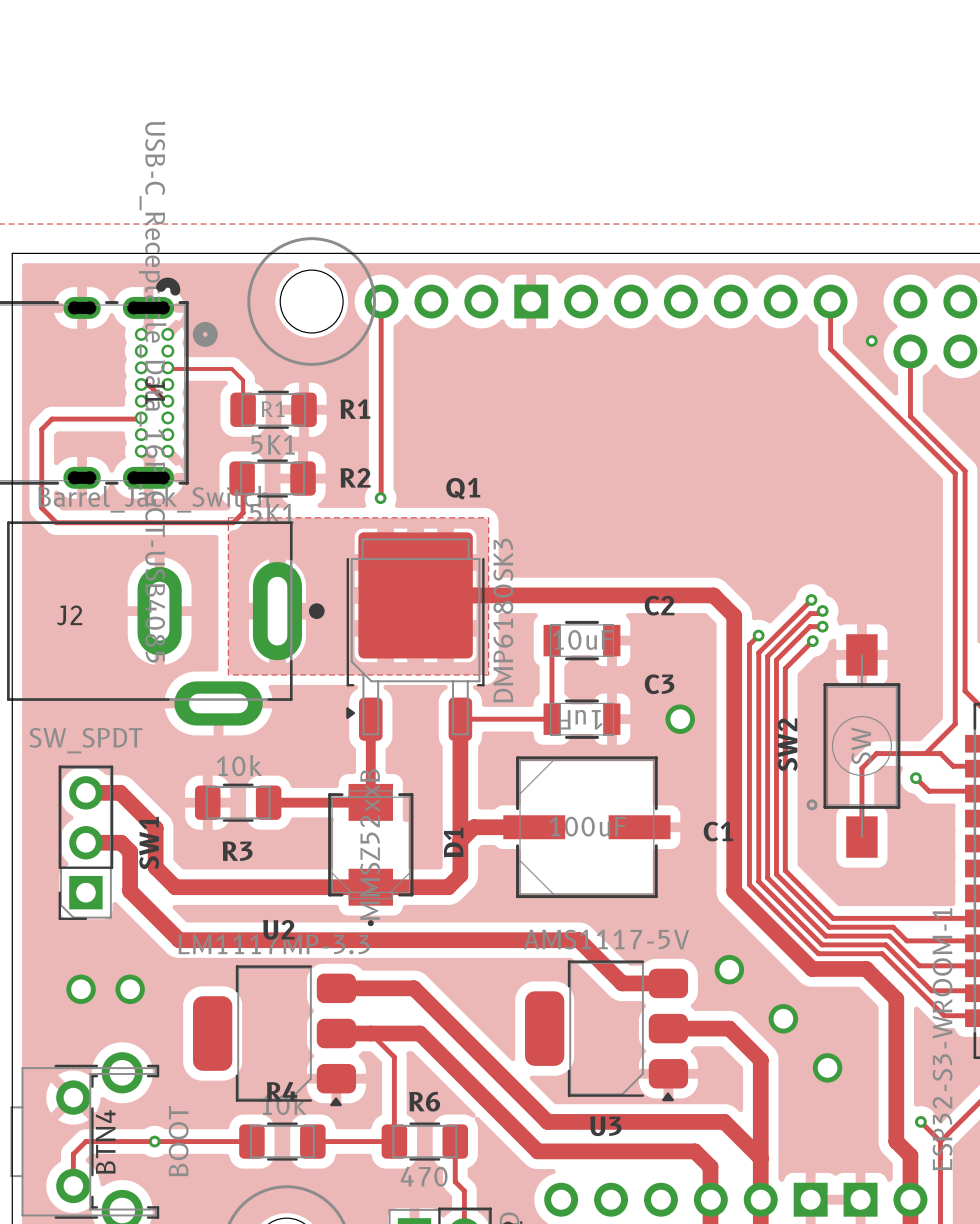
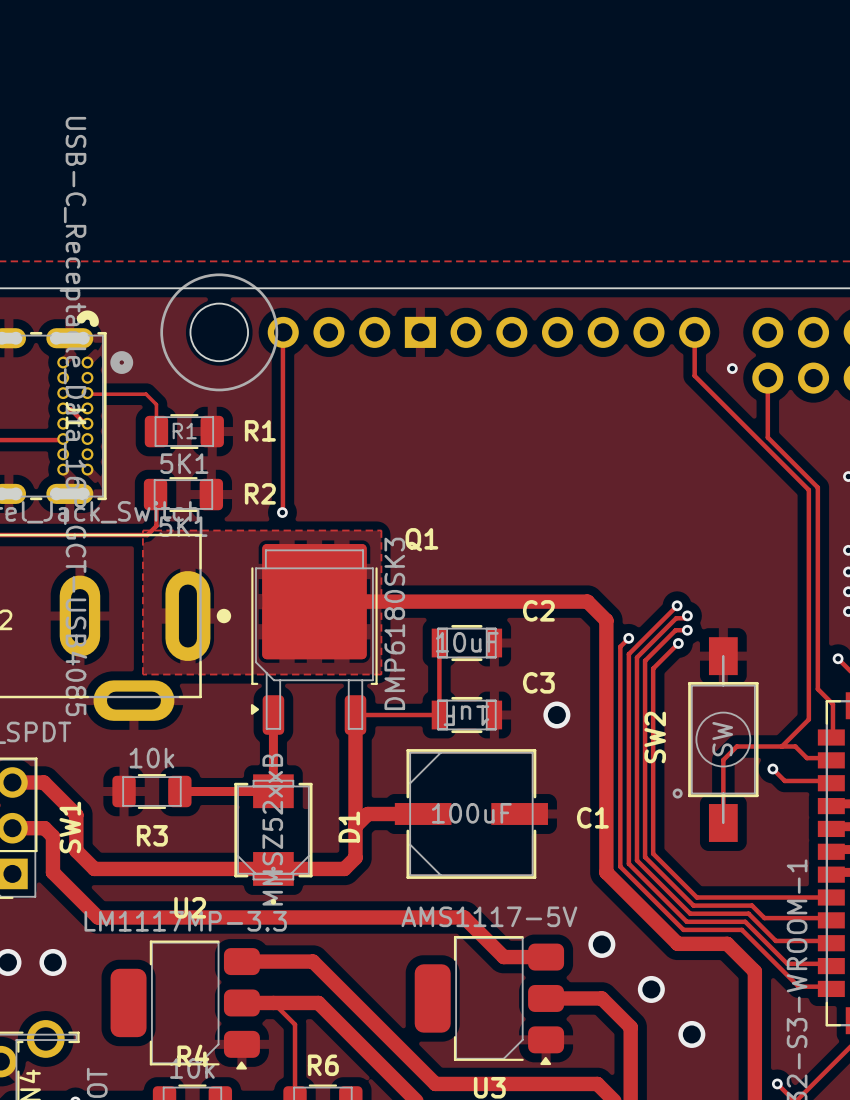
Q1 name position: Q1 (463, 488) -> Q1 (421, 539)

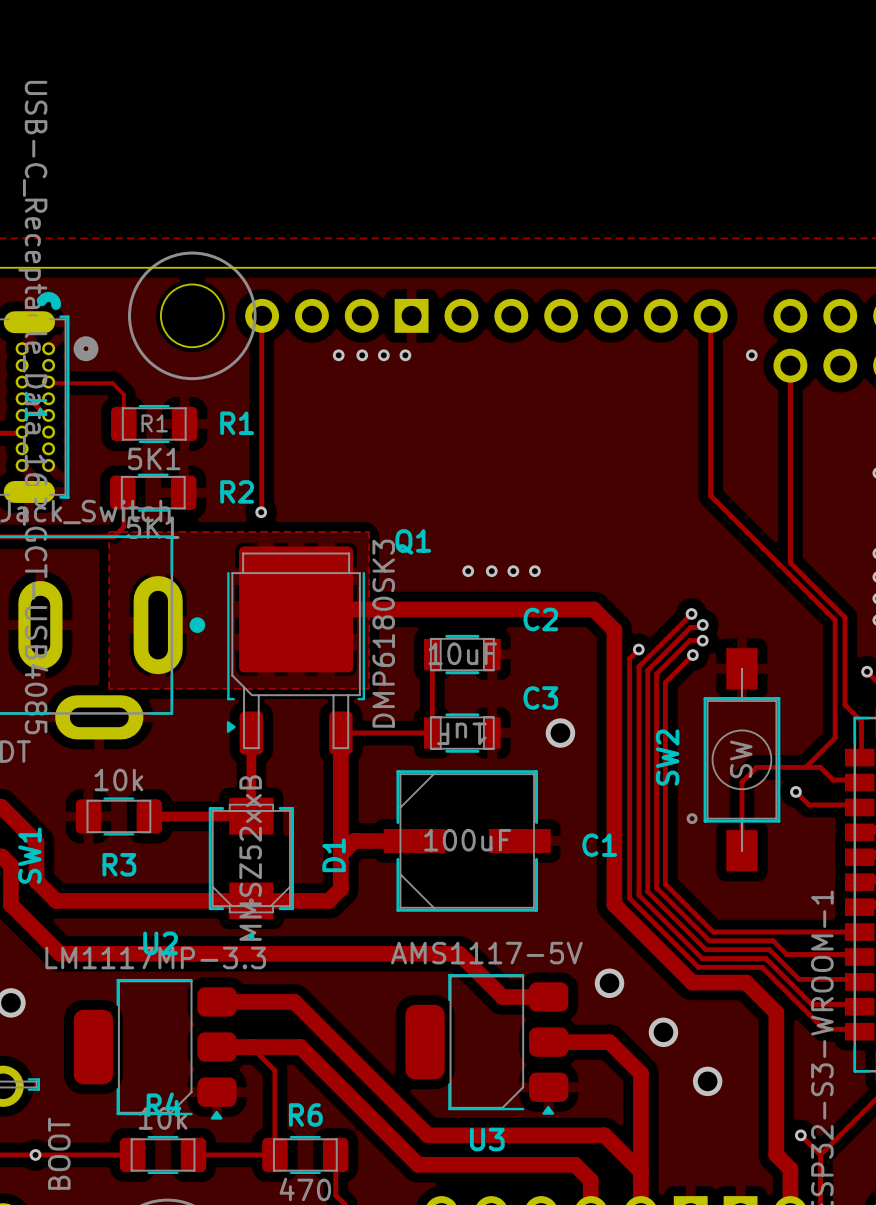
via: none -> (338, 355)
via: none -> (362, 355)
via: none -> (383, 355)
via: none -> (405, 355)
track: (694, 375) (808, 490) (808, 611) -> (710, 363) (710, 495) (835, 620)
track: (767, 437) (817, 487) (817, 609) -> (790, 430) (790, 562) (844, 617)
via: none -> (468, 571)
via: none -> (491, 571)
via: none -> (513, 571)
via: none -> (534, 571)

